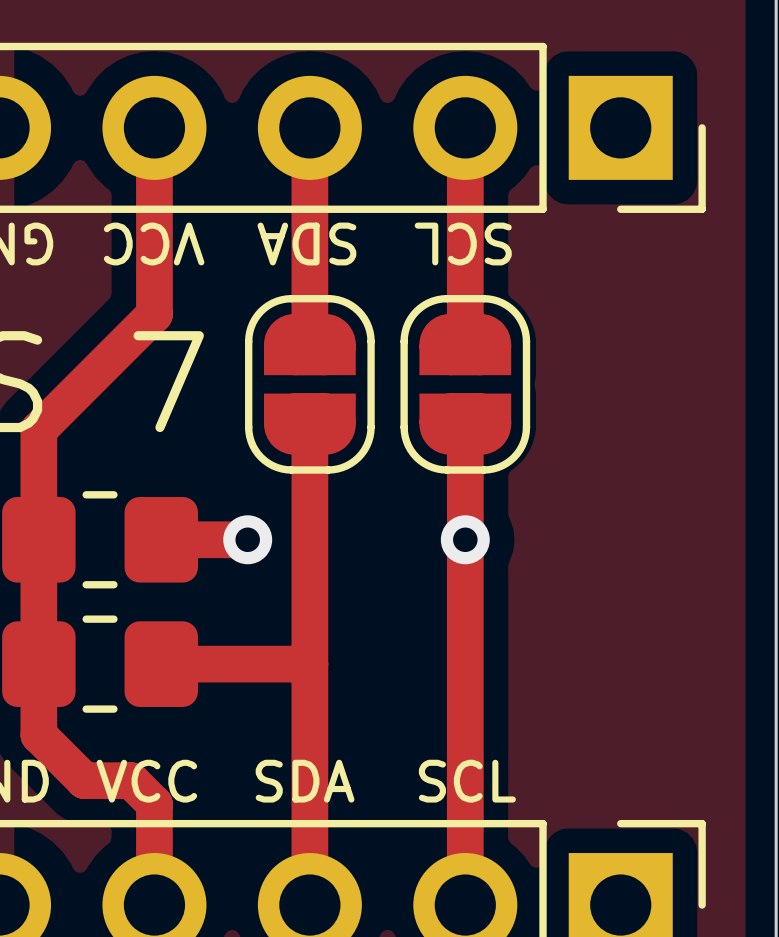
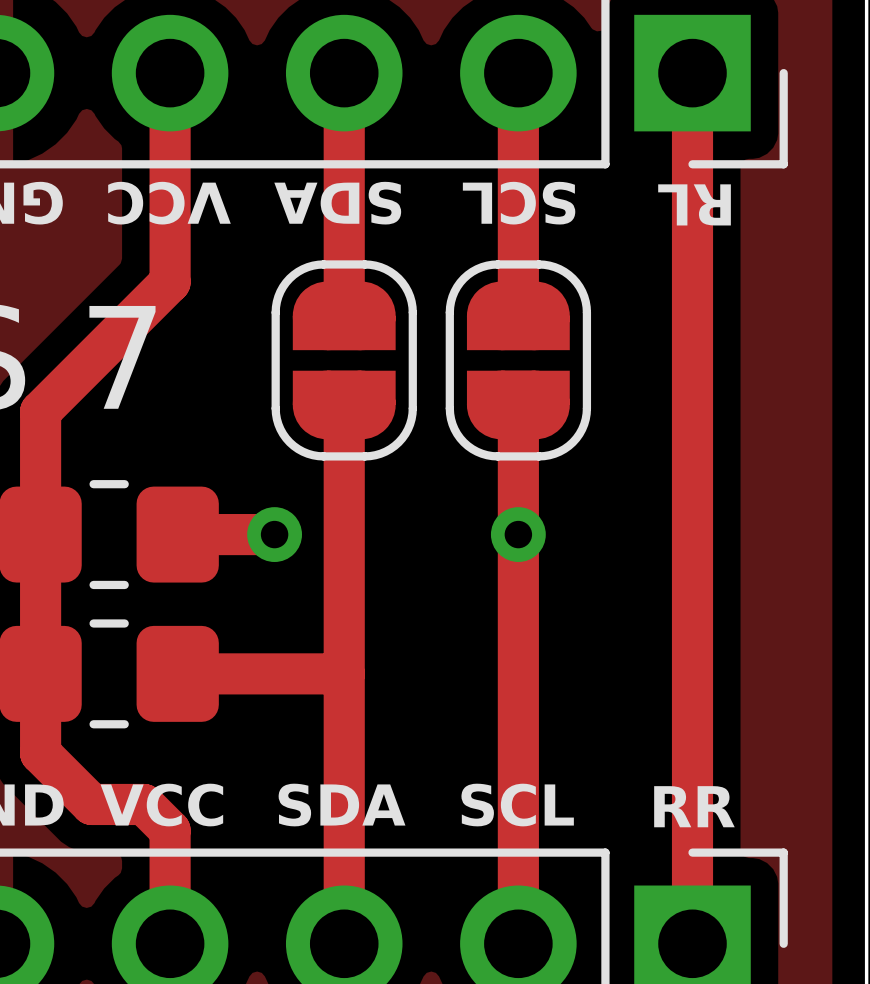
track: none -> (692, 73) (692, 943)
text: none -> RL (694, 204)
text: none -> RR (694, 806)

